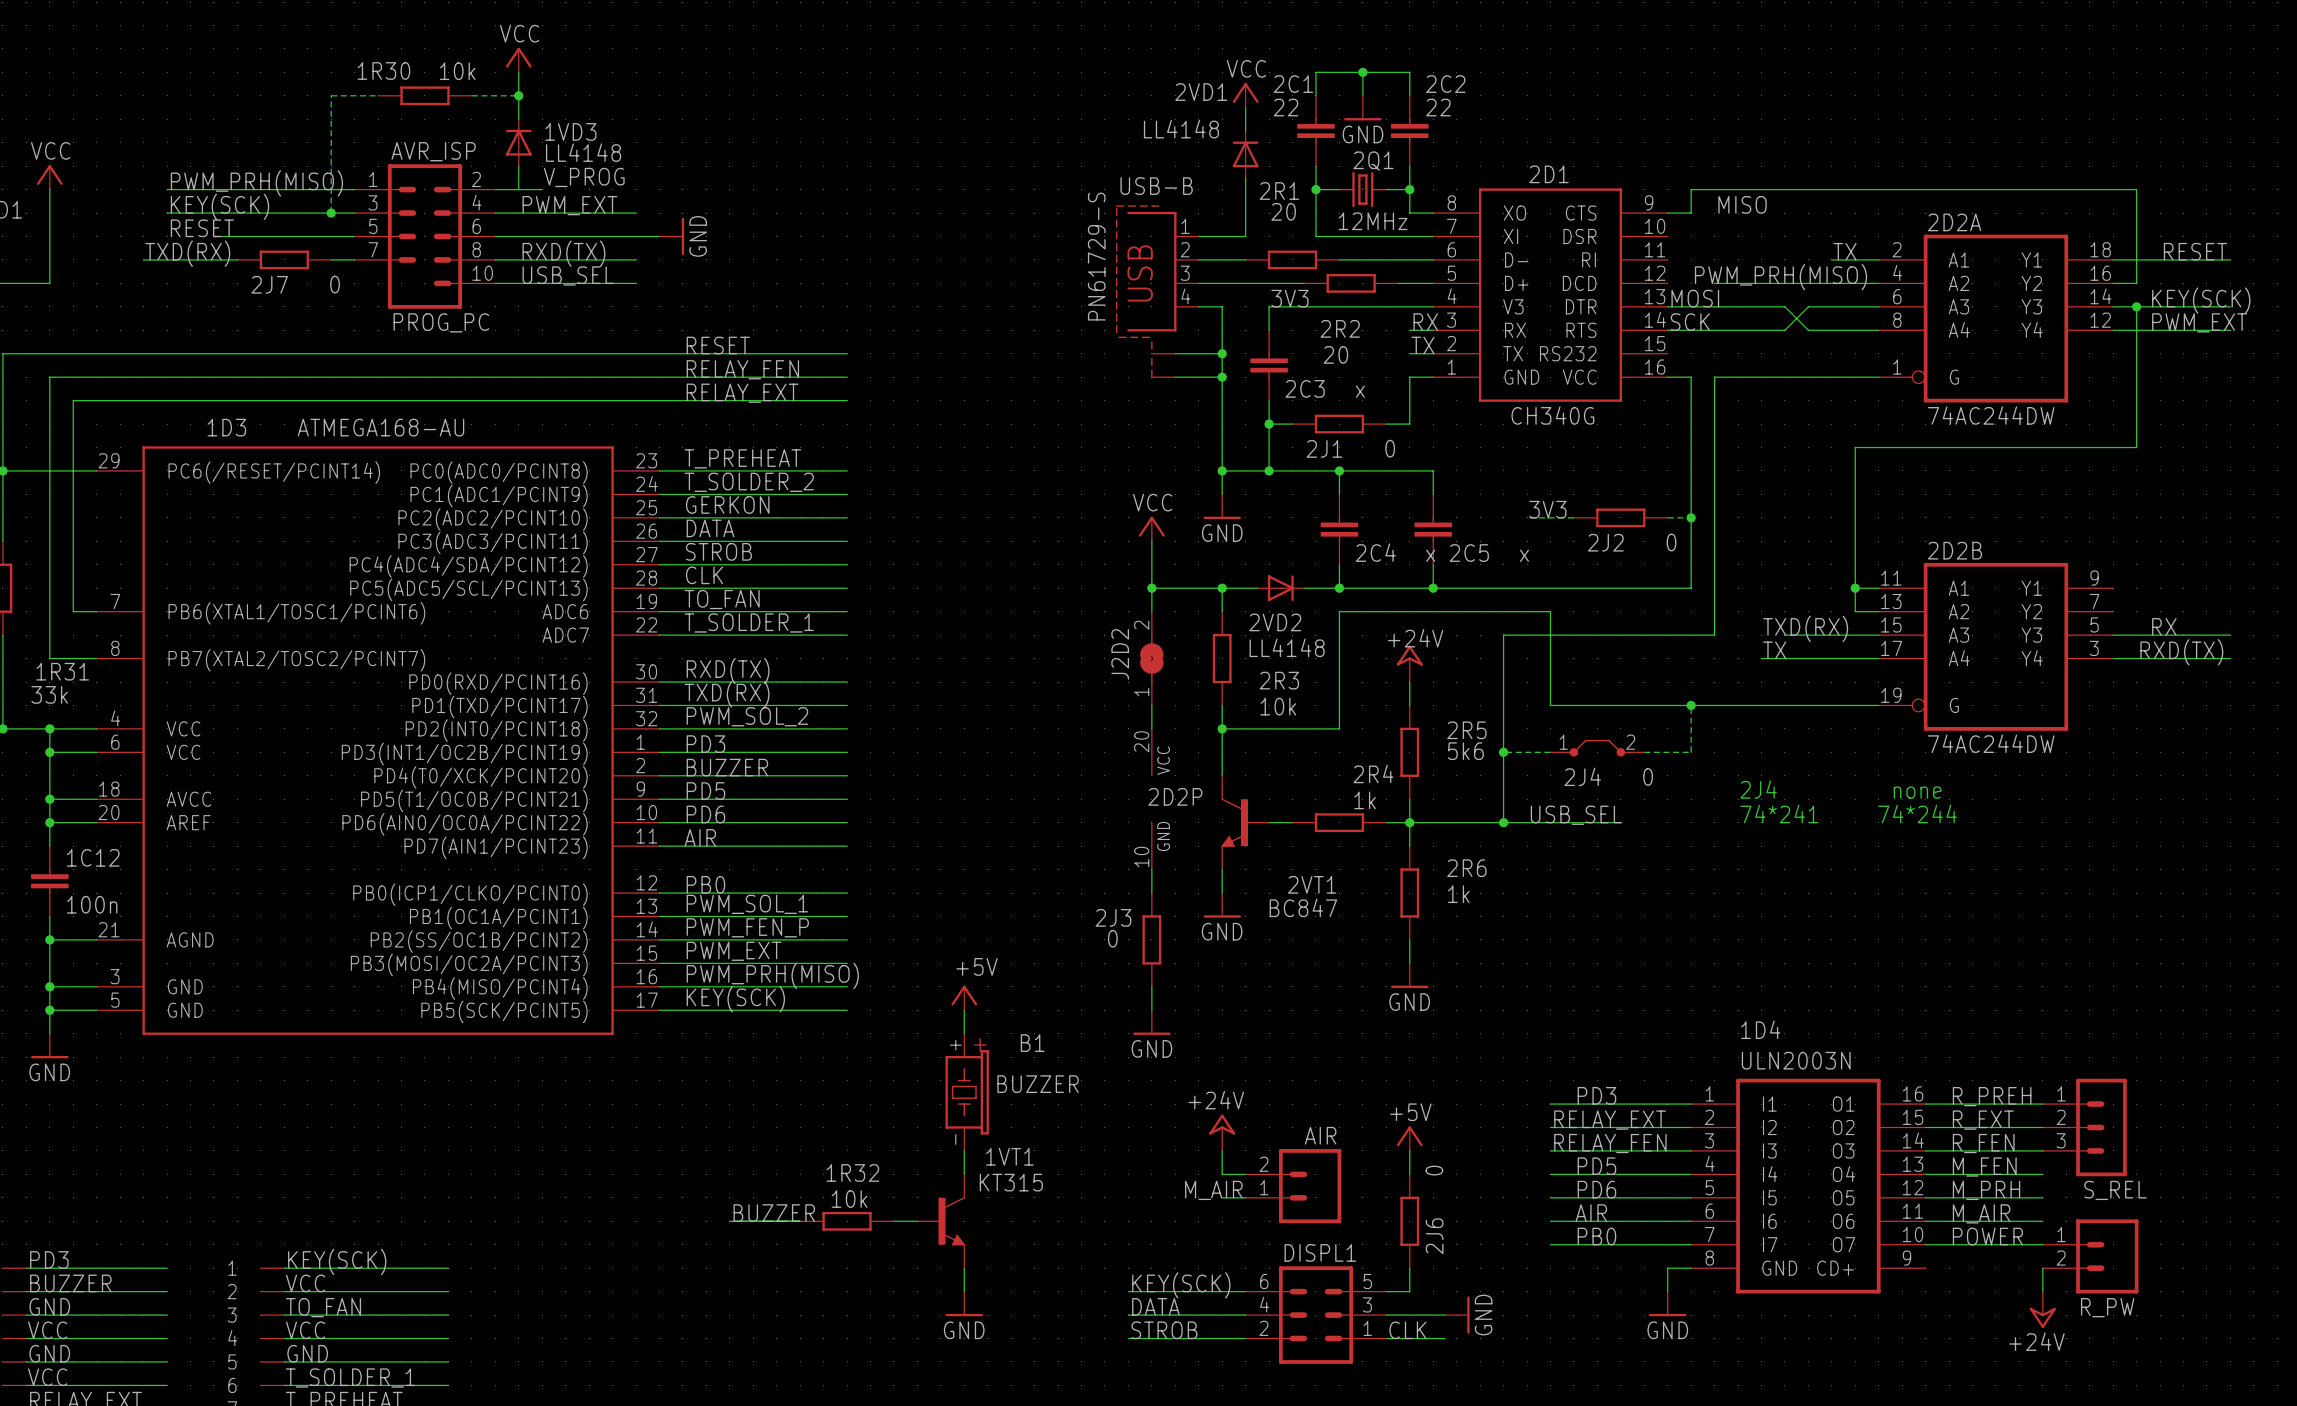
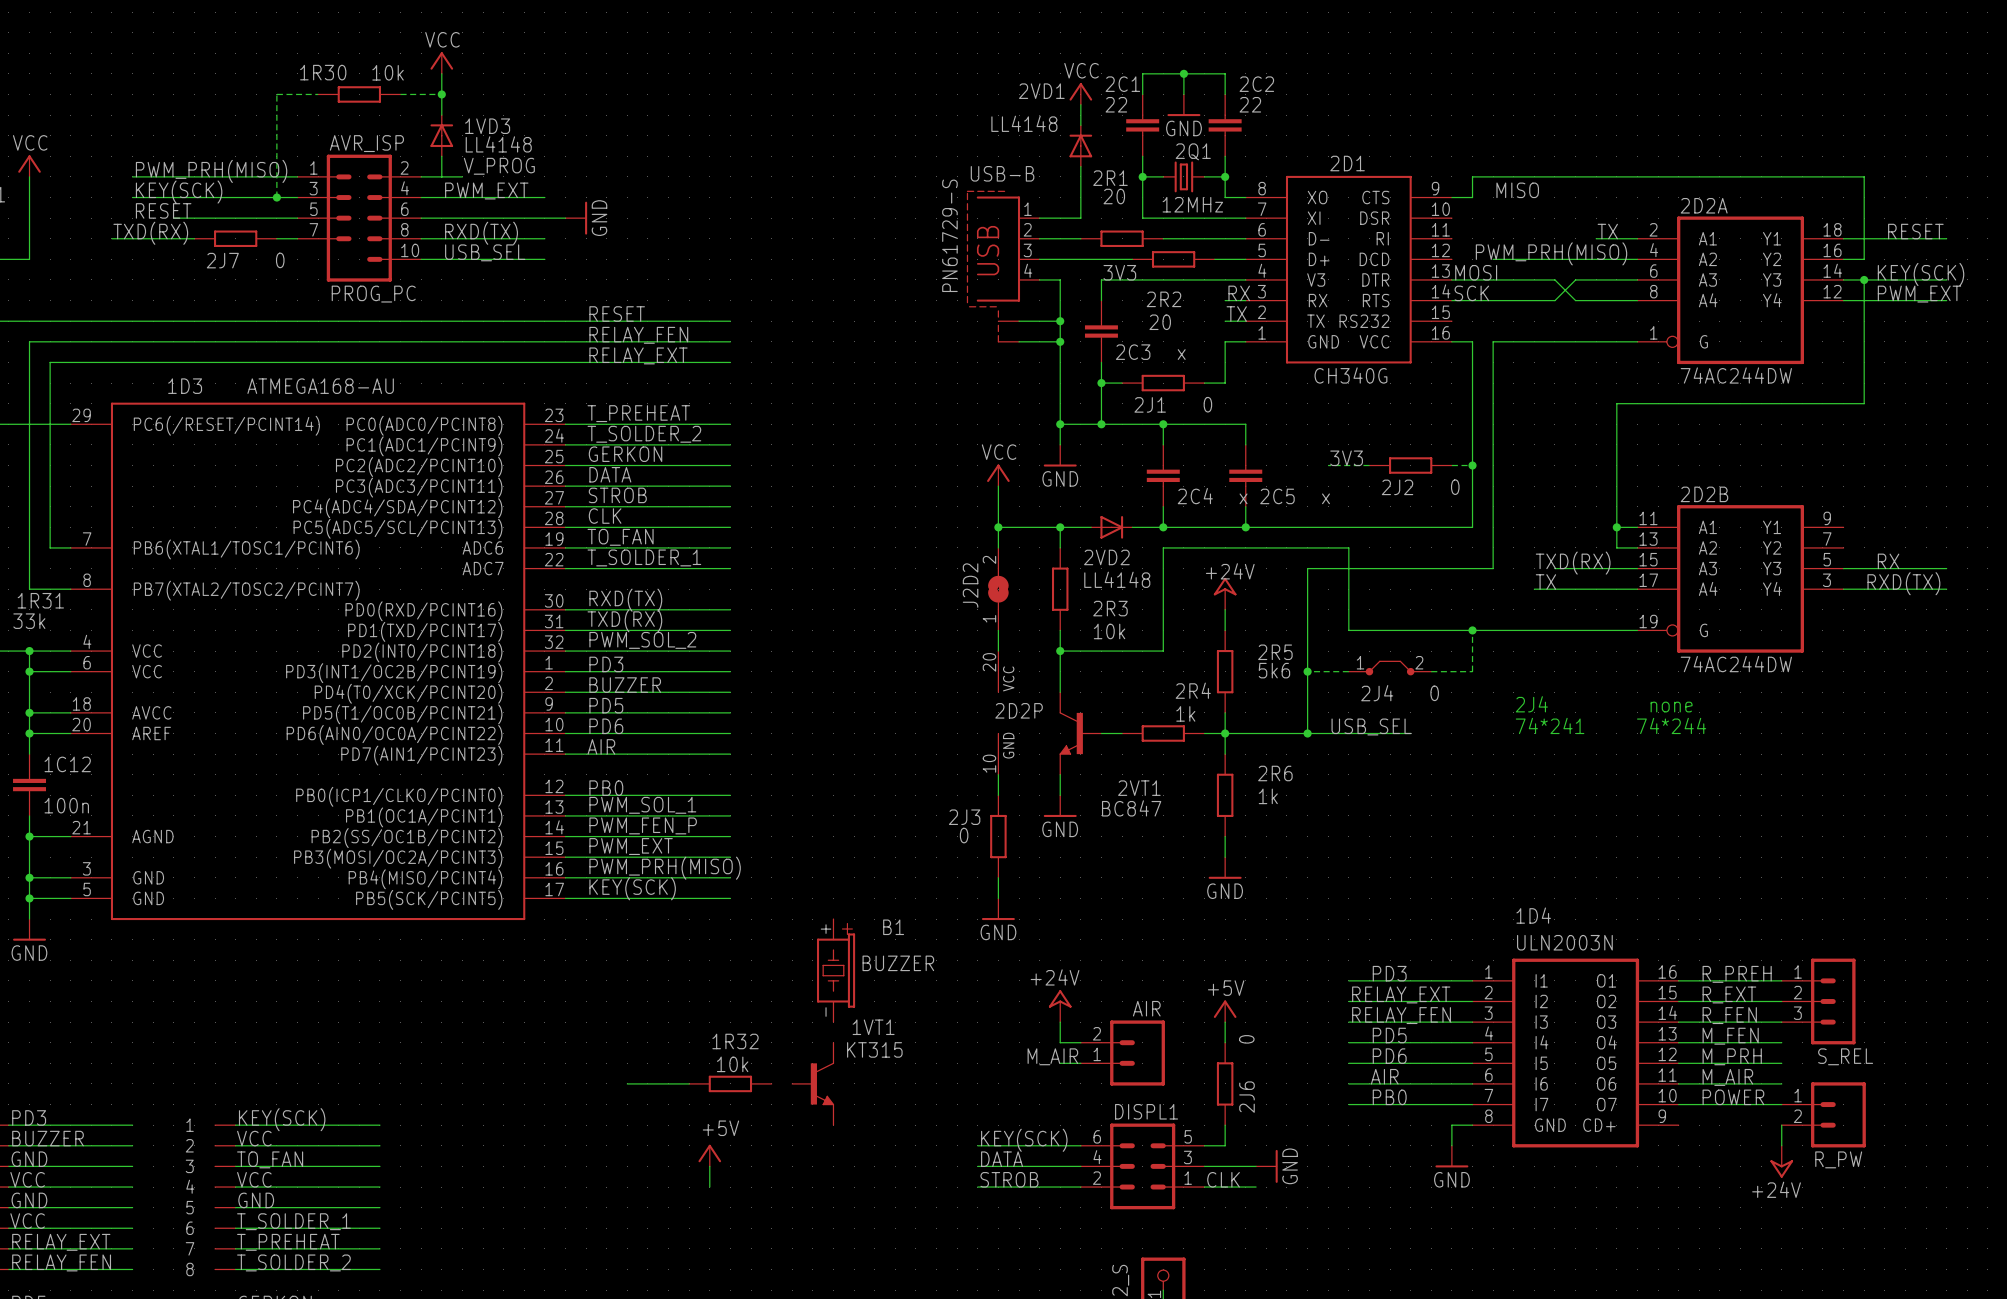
power symbol: +5V (964, 997) -> none
wire: (964, 1010) (964, 1033) -> none
wire: (964, 1150) (964, 1174) -> none
label: BUZZER (774, 1213) -> none
wire: (893, 1221) (917, 1221) -> none
wire: (964, 1268) (964, 1291) -> (709, 1166) (709, 1187)
power symbol: none -> +5V (709, 1155)
power symbol: GND (964, 1303) -> none

